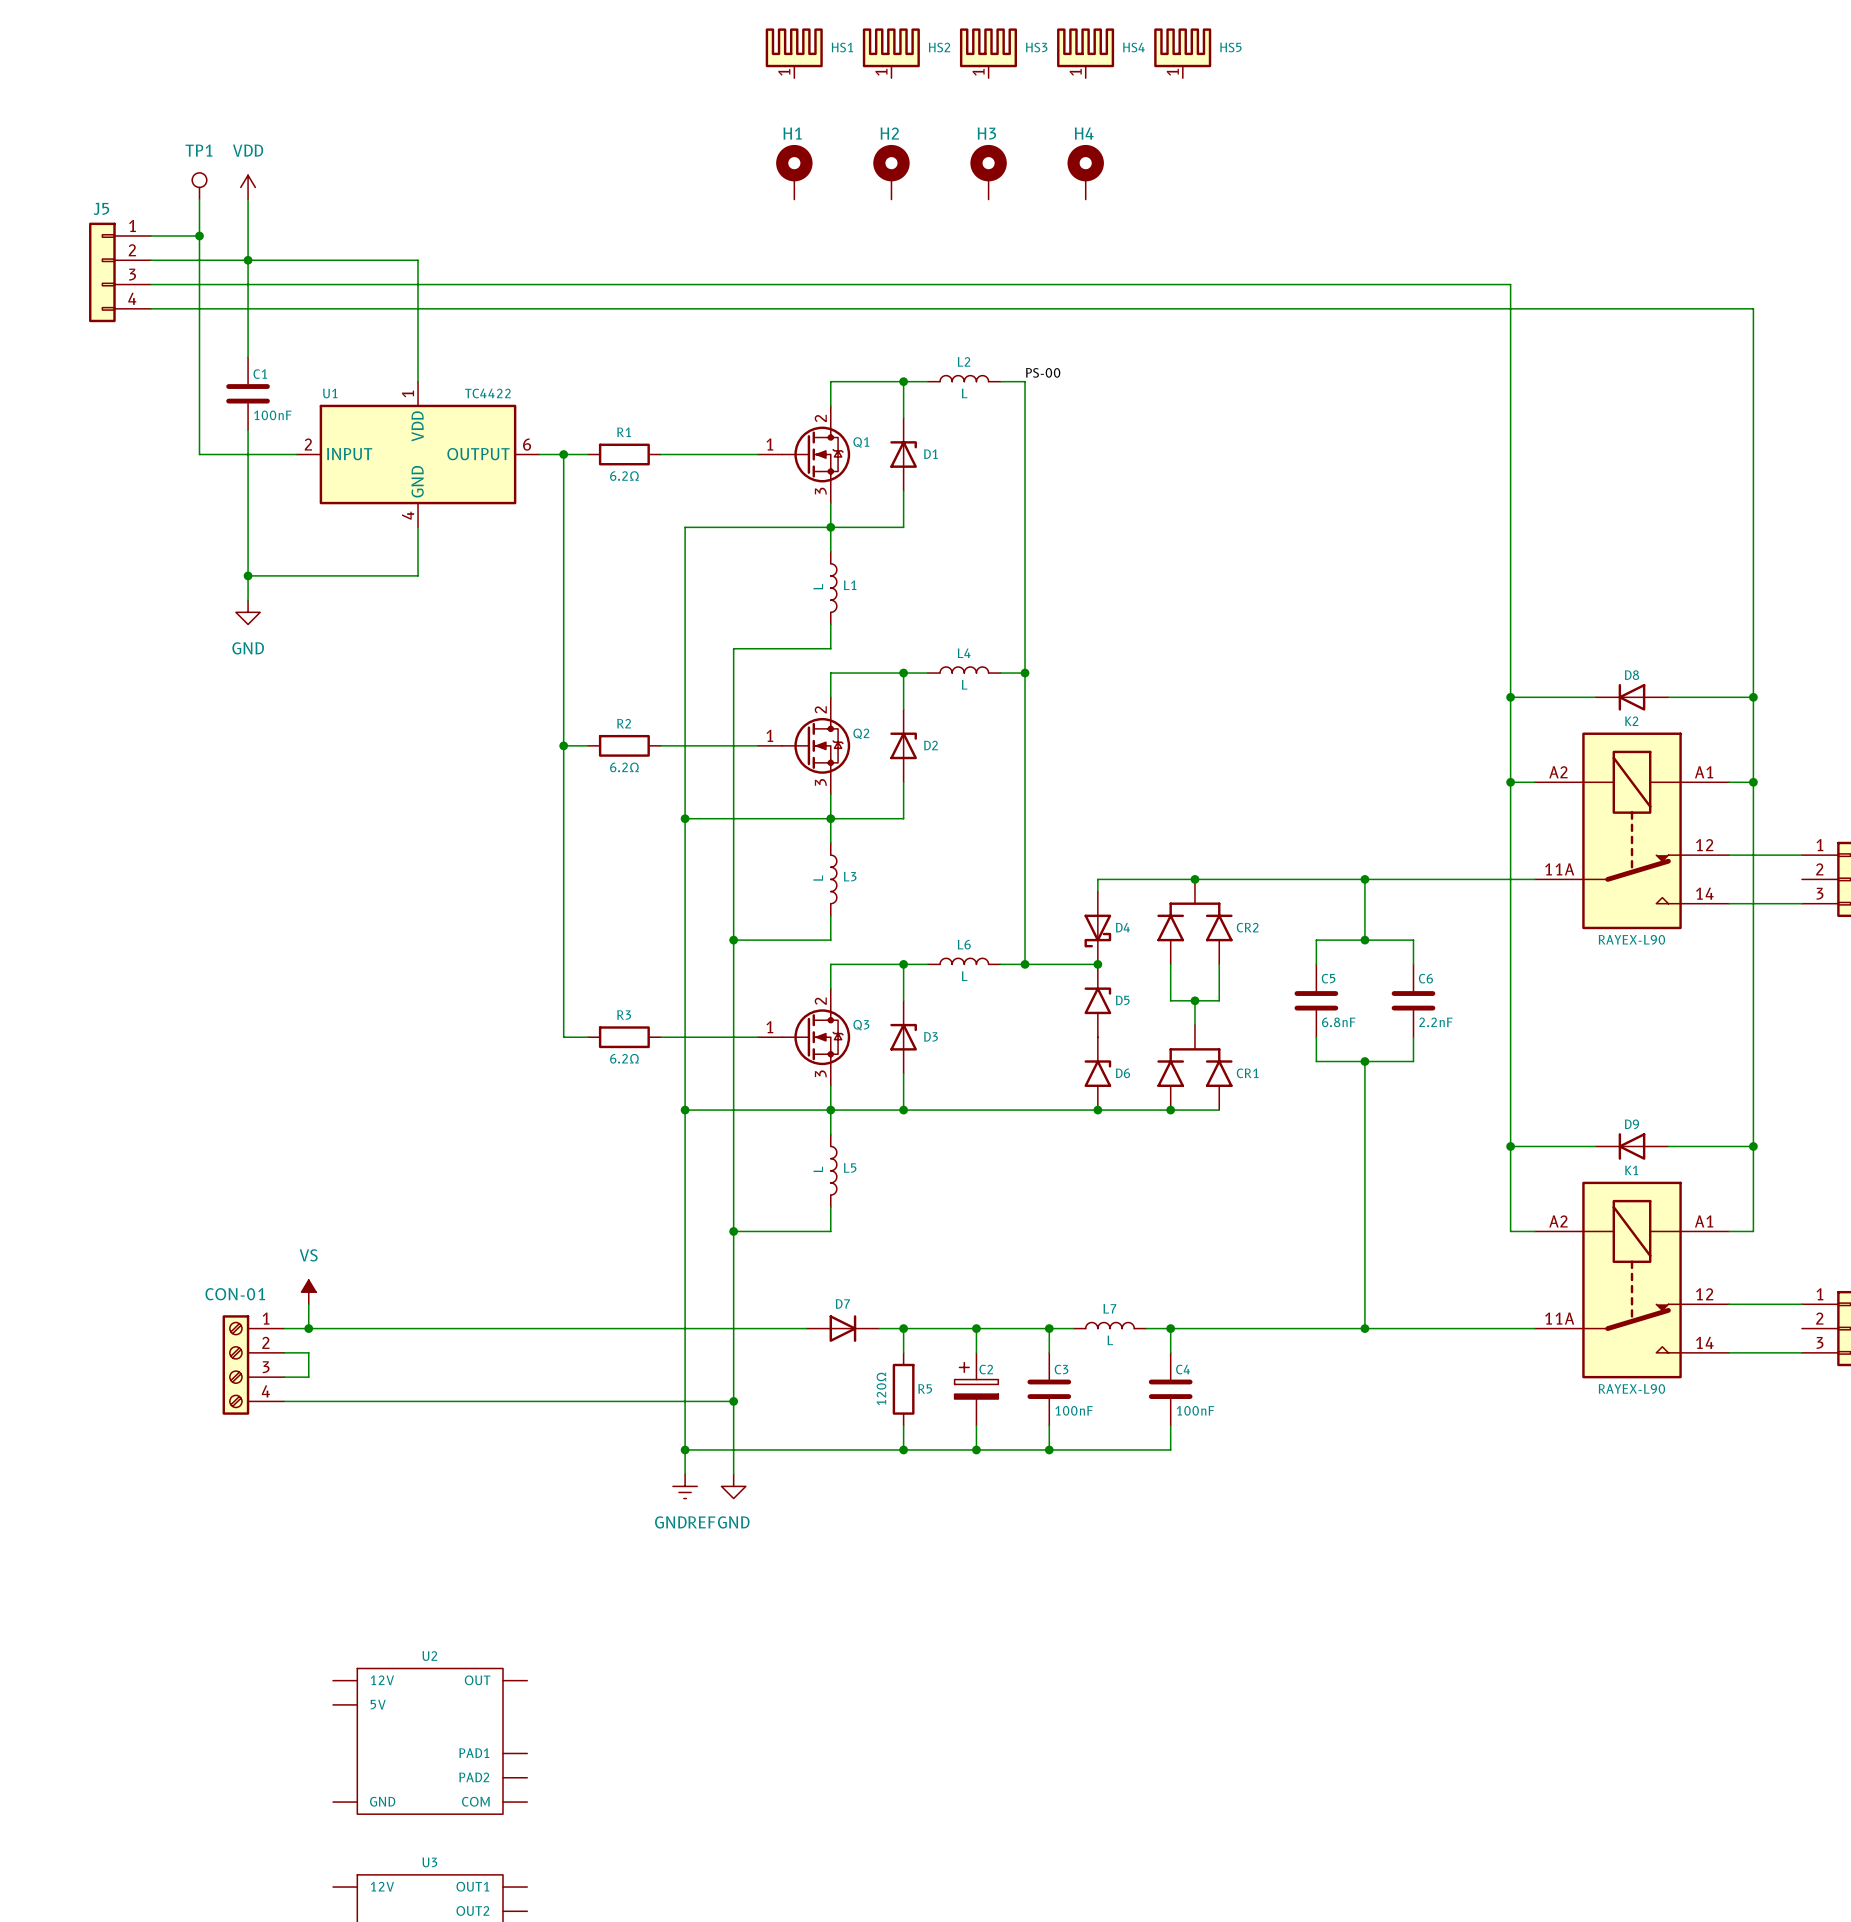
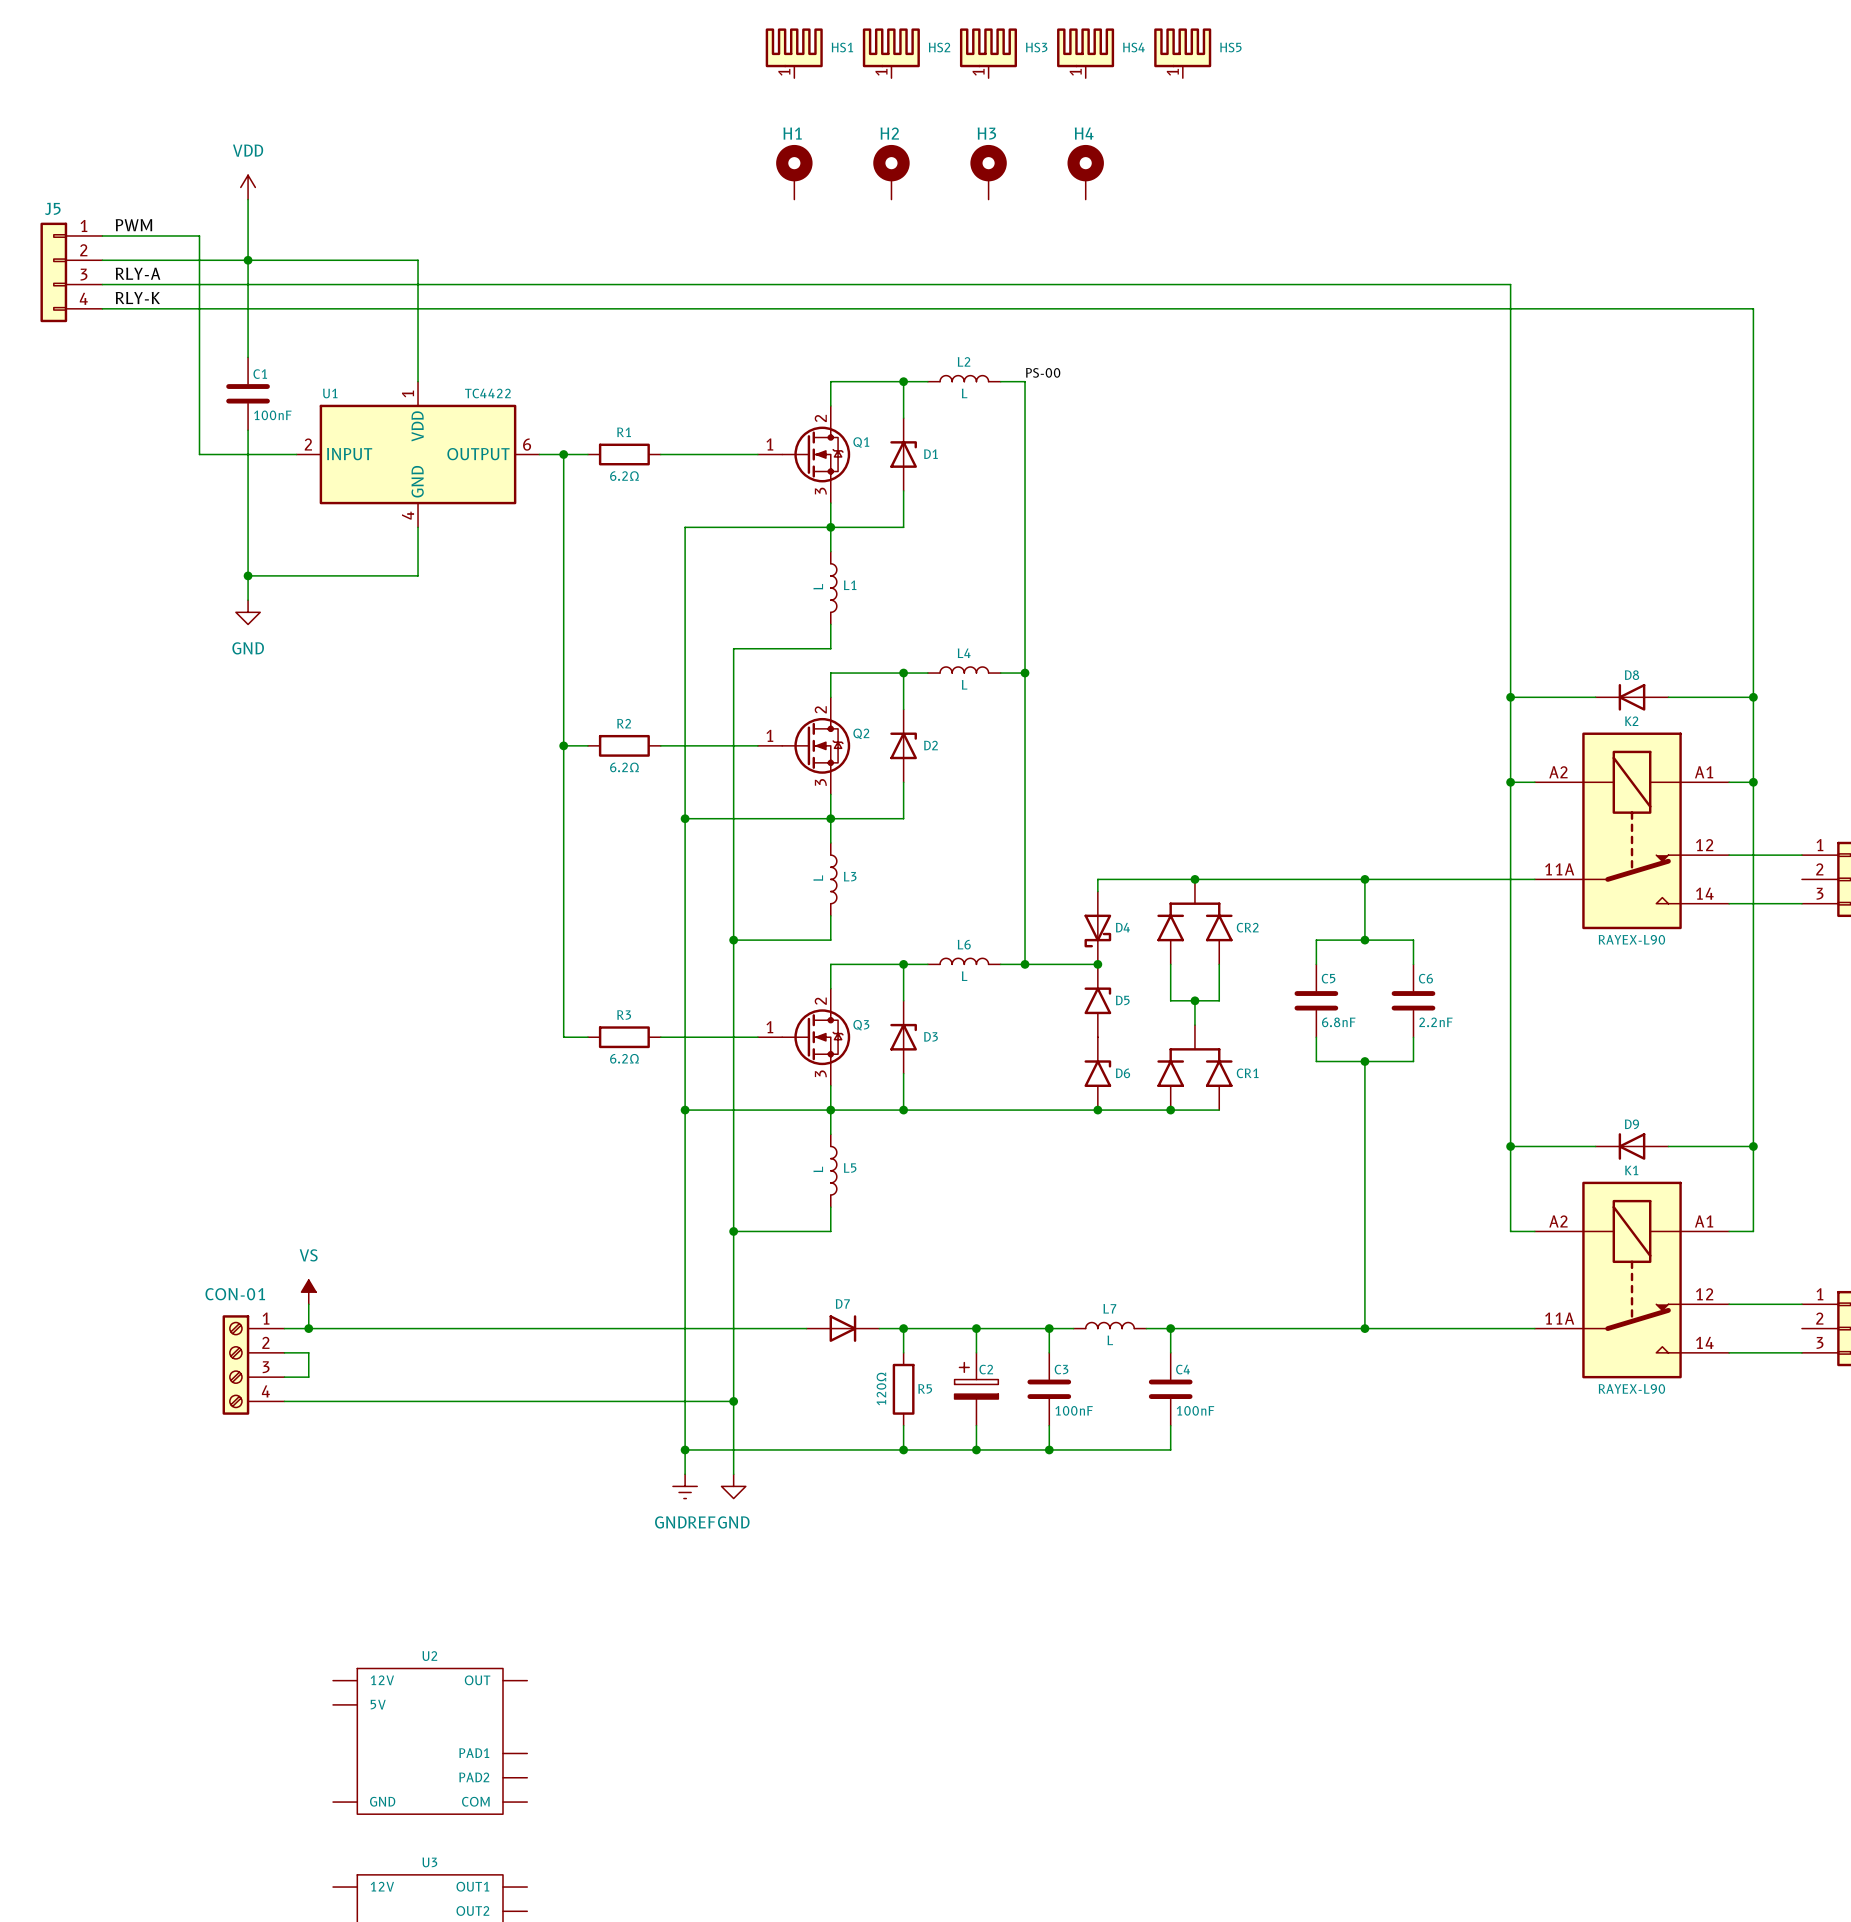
TP1: (199, 186) -> none
wire: (199, 199) (199, 235) -> none
label: none -> PWM (133, 225)
junction: (199, 235) -> none
J5 position: (119, 272) -> (71, 272)
label: none -> RLY-A (138, 273)
label: none -> RLY-K (137, 298)

